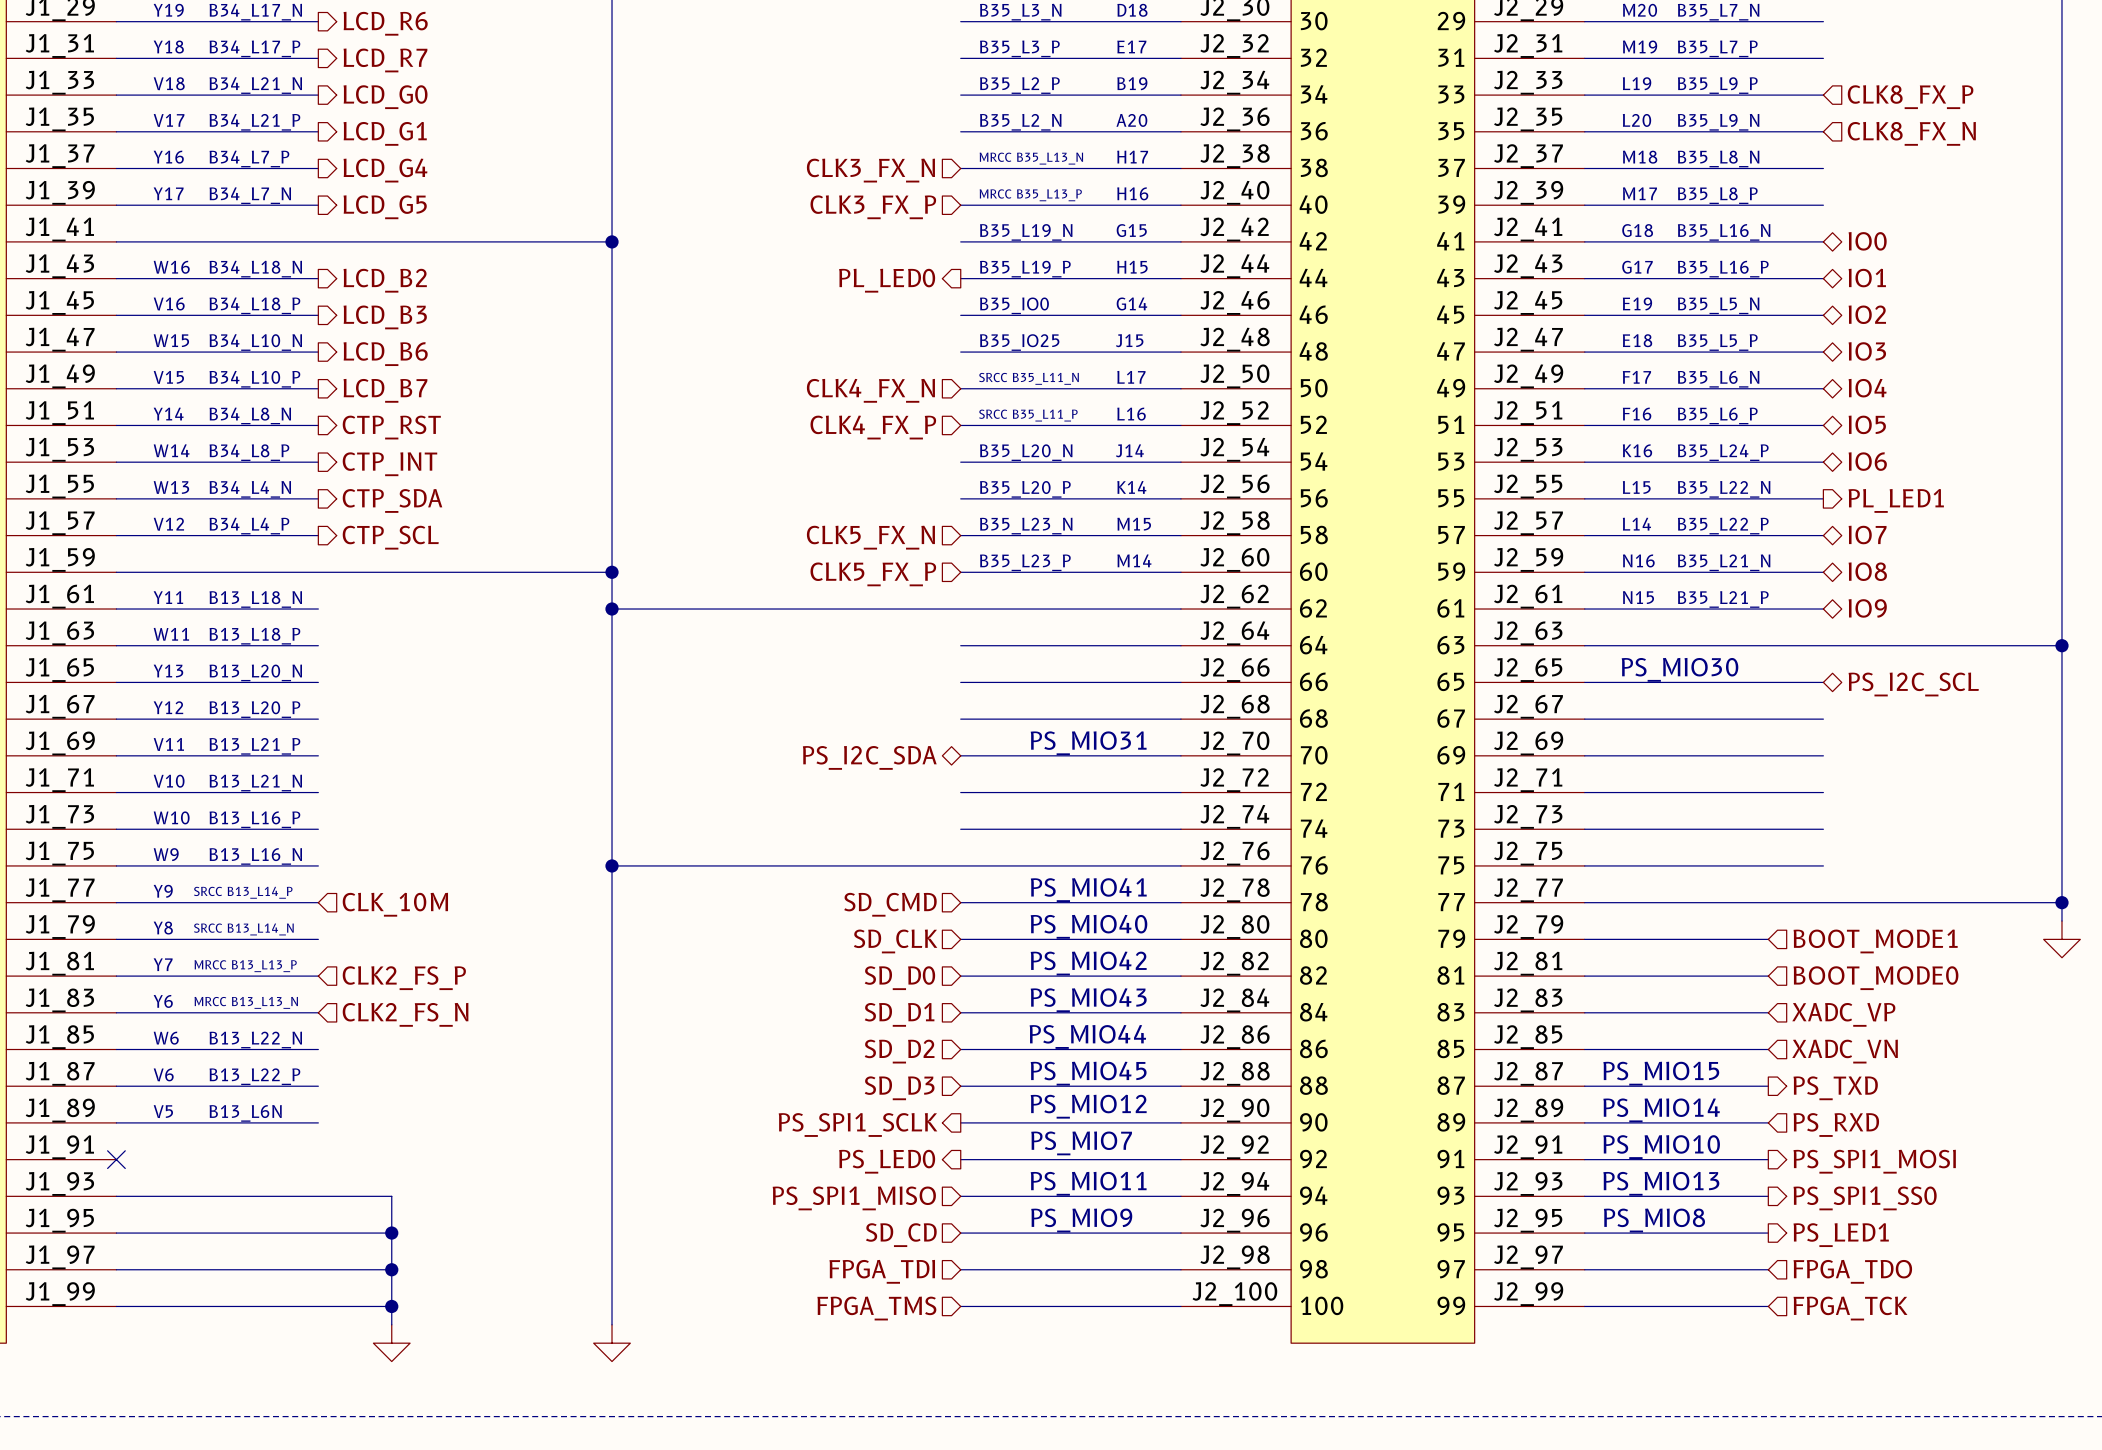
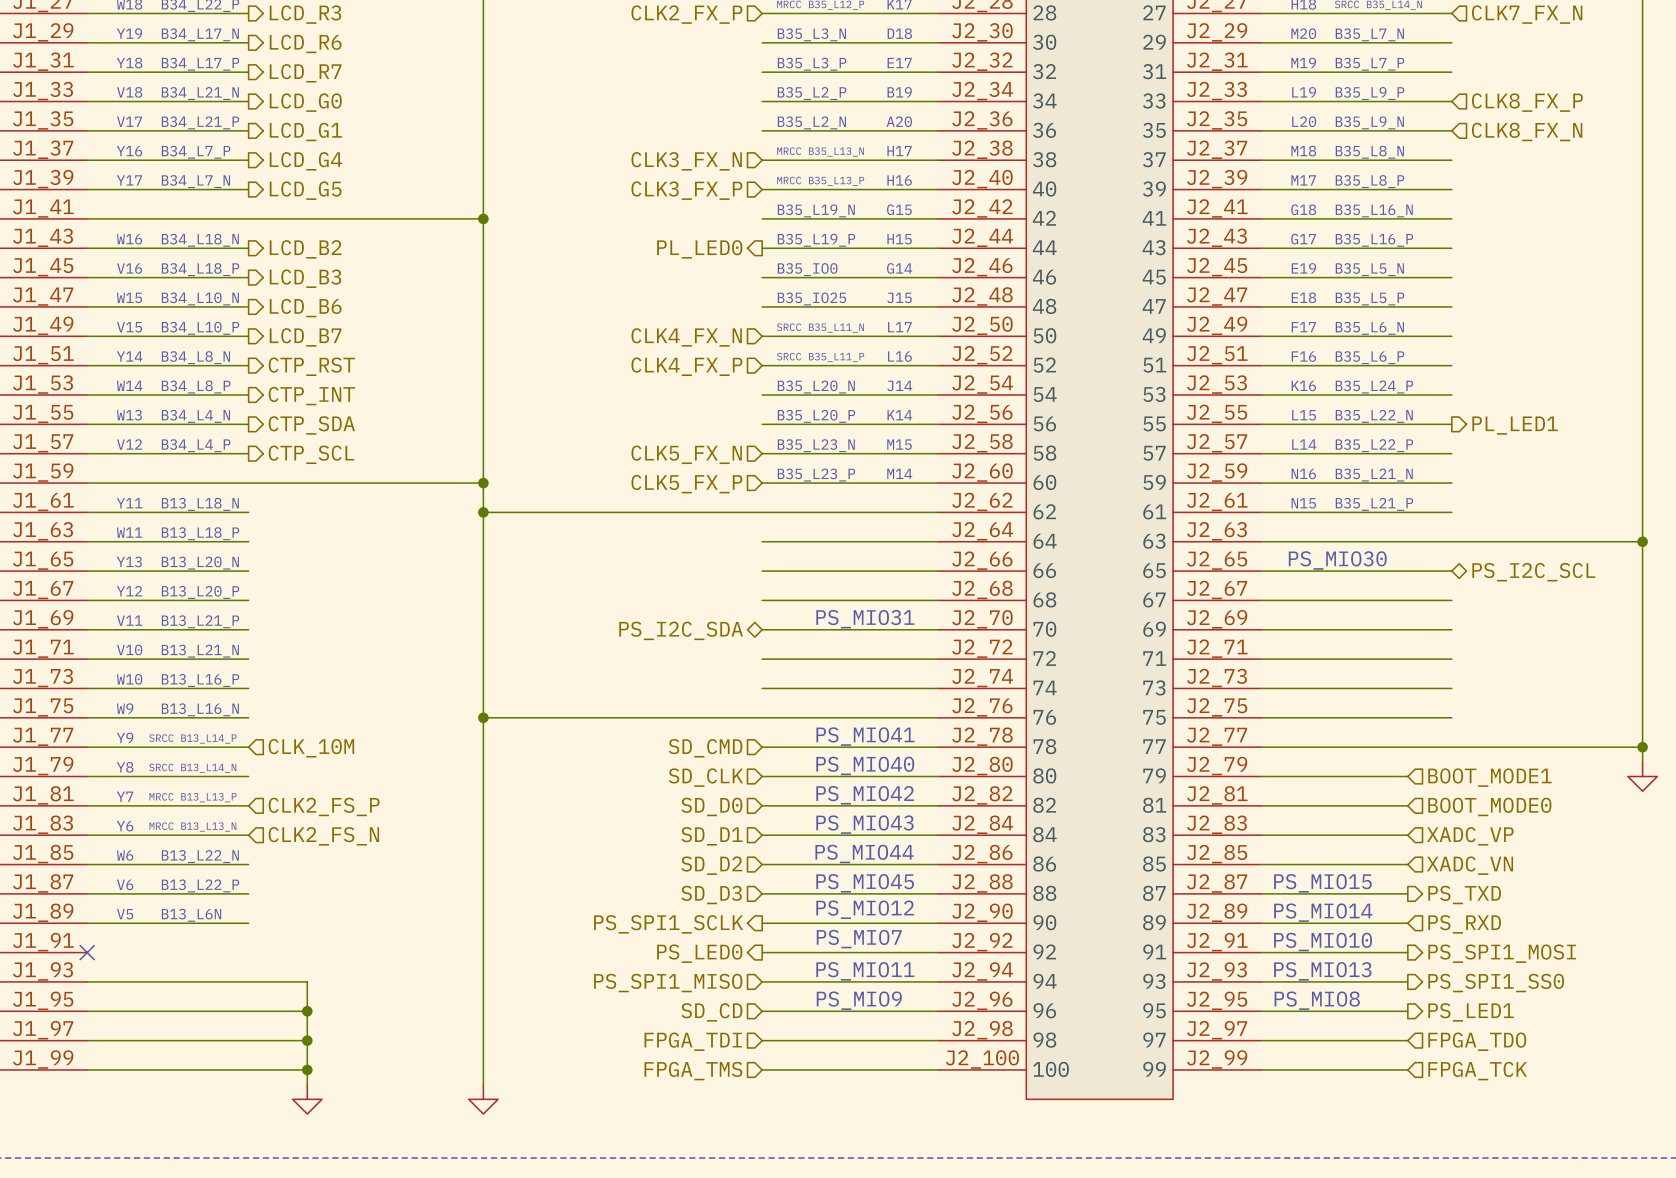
hierarchical label: IO0 (1867, 241) -> none
hierarchical label: IO1 (1867, 278) -> none
hierarchical label: IO2 (1867, 314) -> none
hierarchical label: IO3 (1867, 351) -> none
hierarchical label: IO4 (1867, 388) -> none
hierarchical label: IO5 (1867, 424) -> none
hierarchical label: IO6 (1867, 461) -> none
hierarchical label: IO7 (1867, 535) -> none
hierarchical label: IO8 (1867, 571) -> none
hierarchical label: IO9 (1867, 608) -> none

